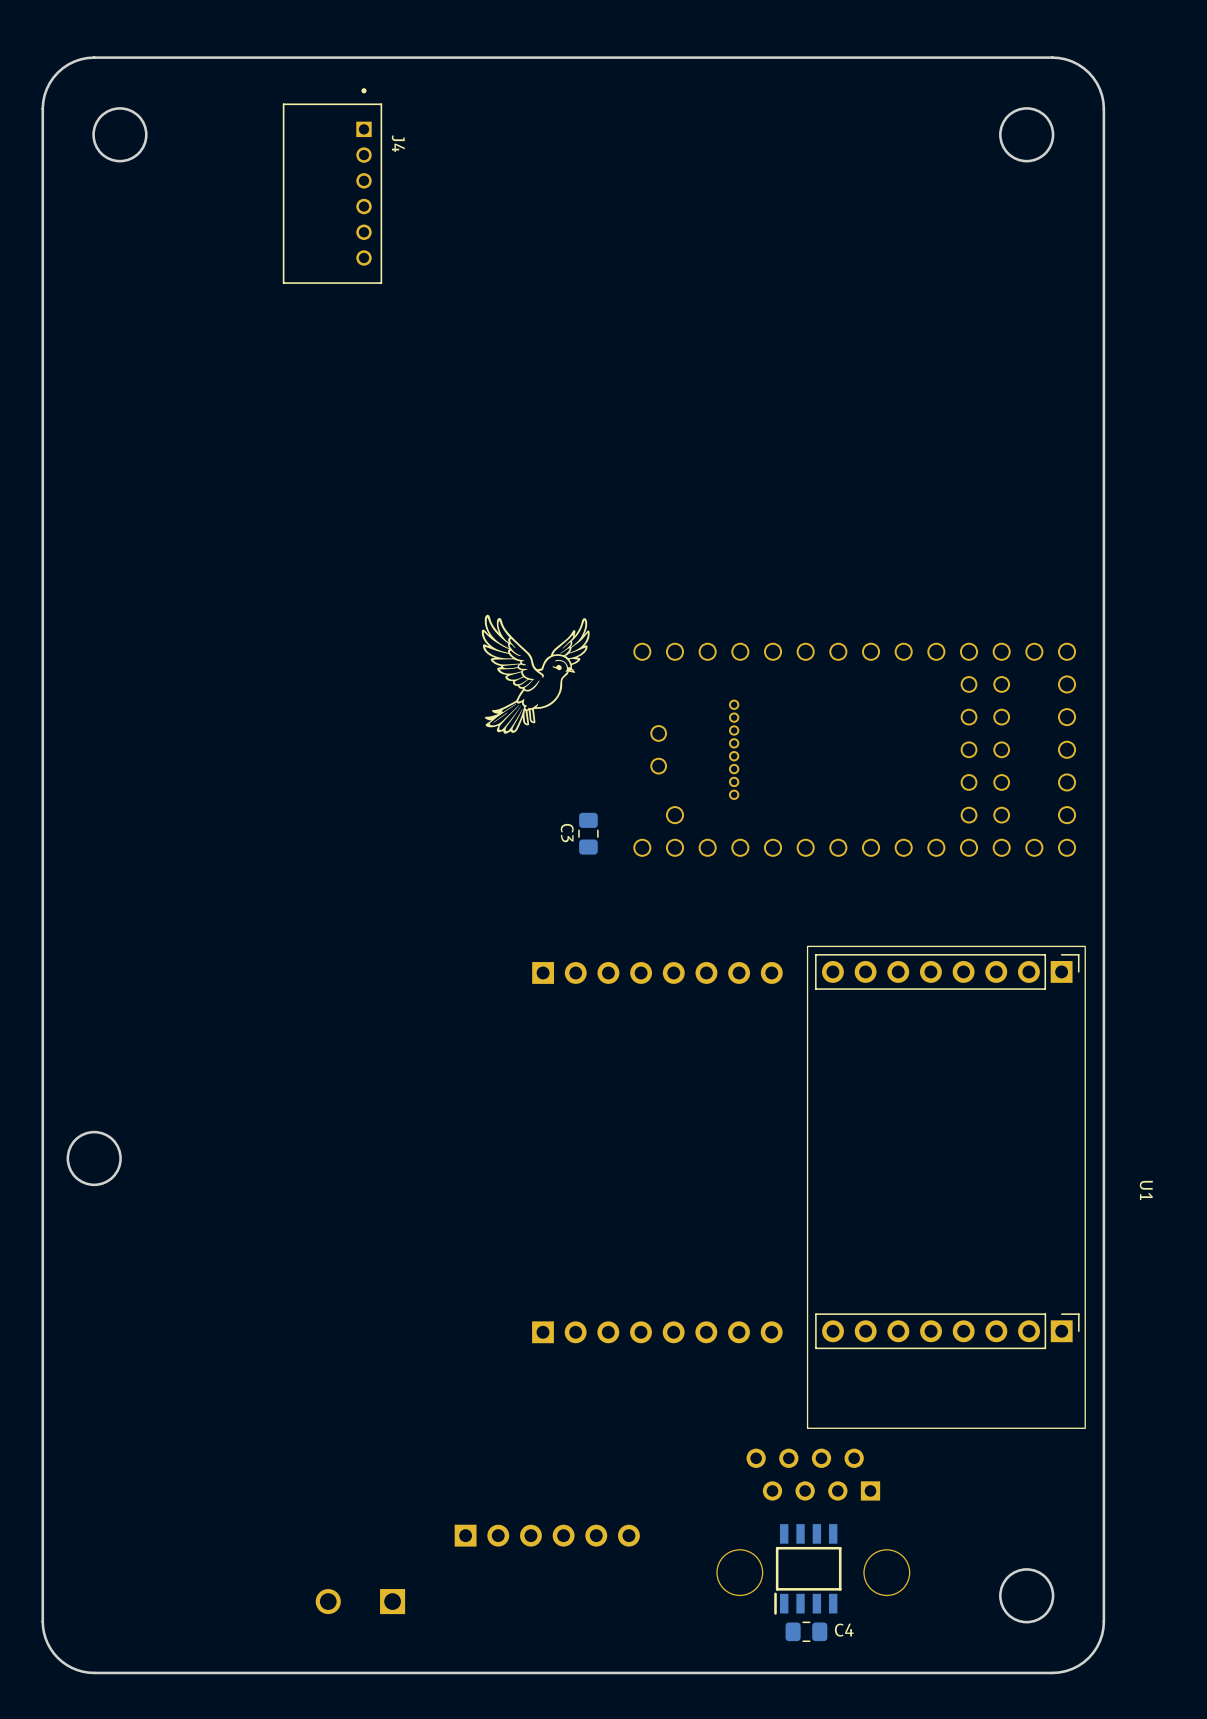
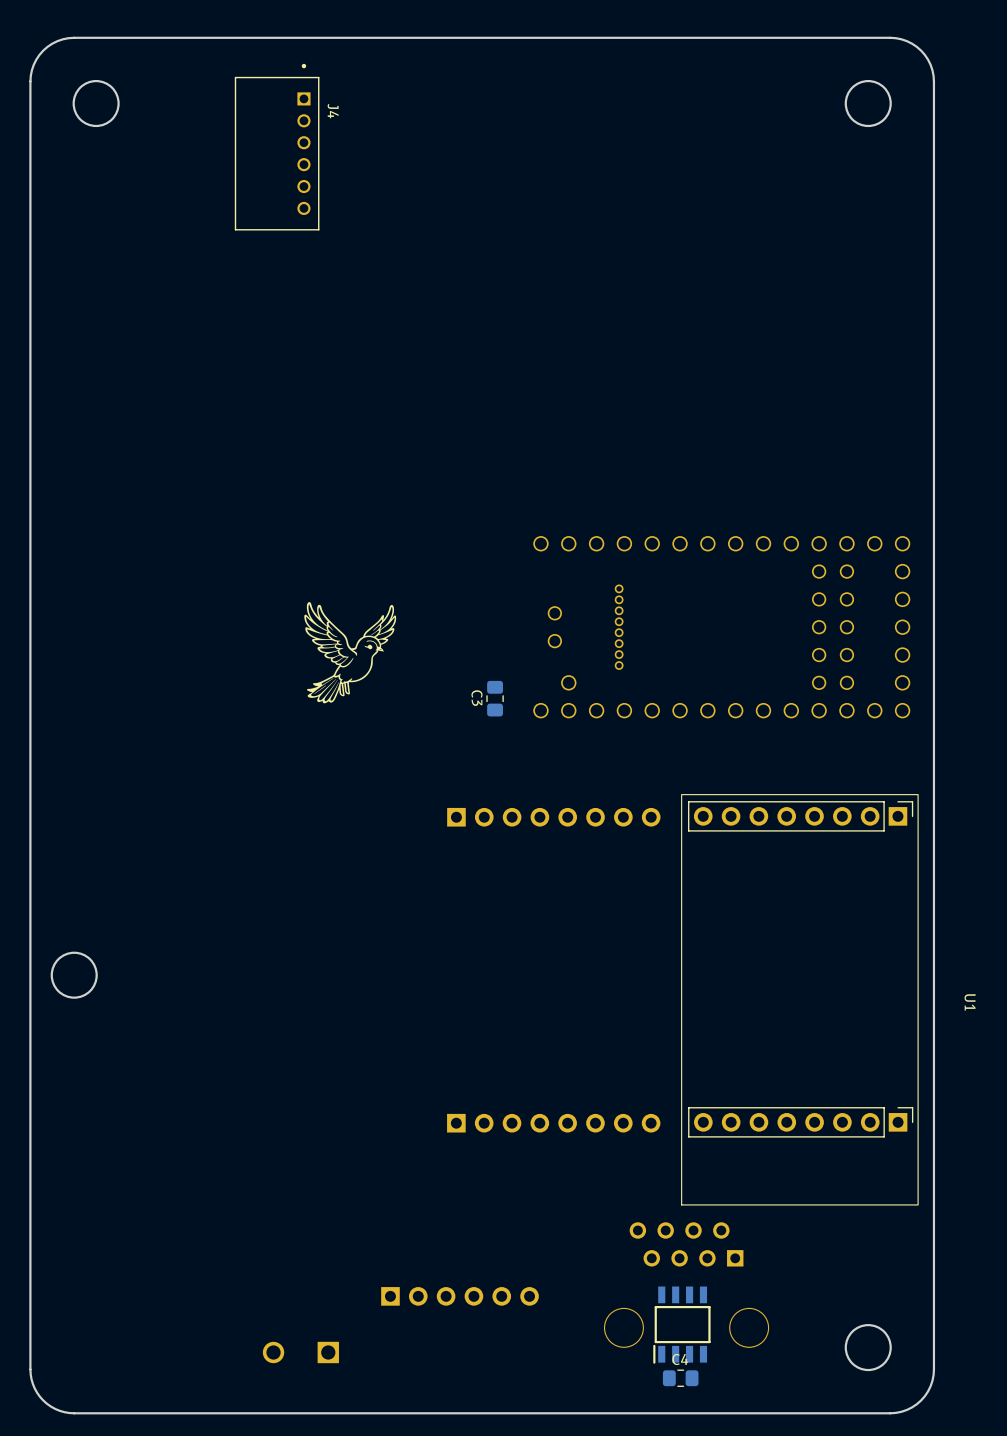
drawing position: (535, 674) -> (350, 652)
C4 name position: C4 (844, 1630) -> C4 (680, 1359)

